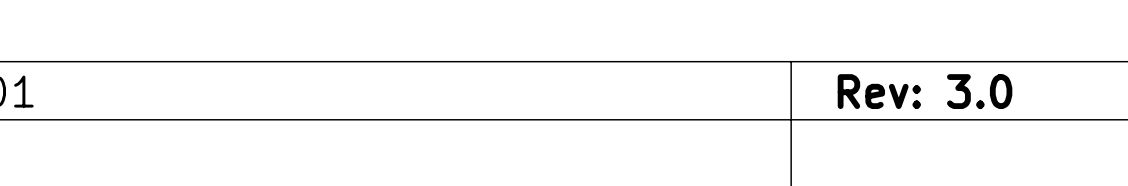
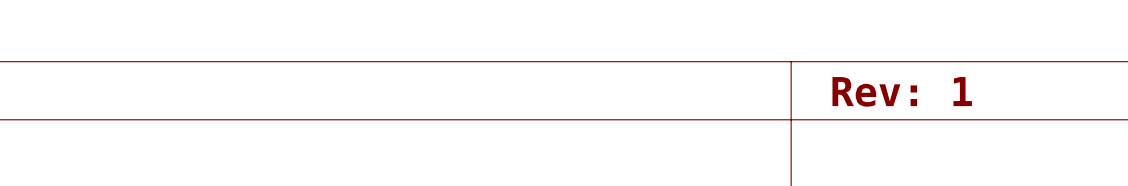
title block: Rev: 3.0 (925, 91) -> Rev: 1 (902, 91)

